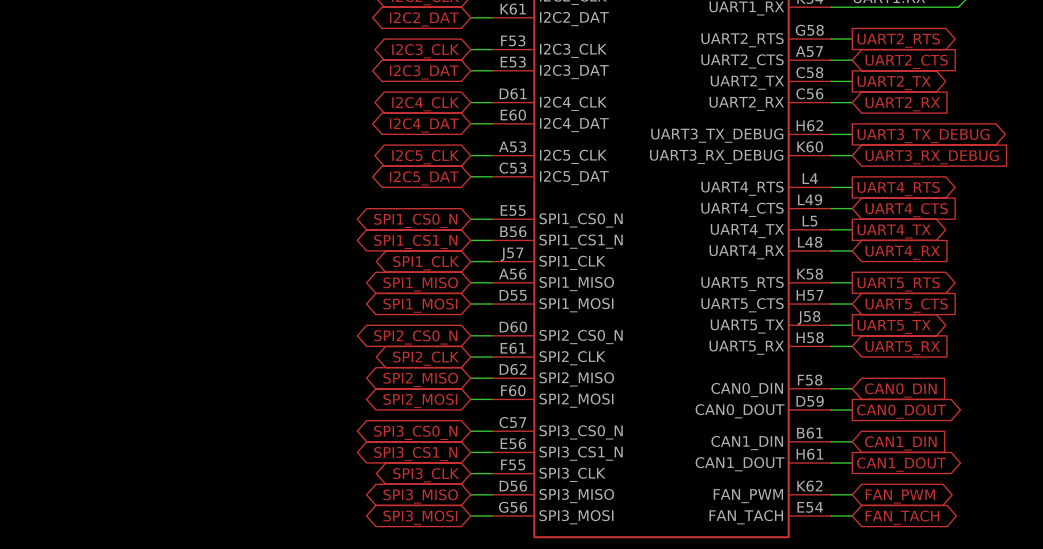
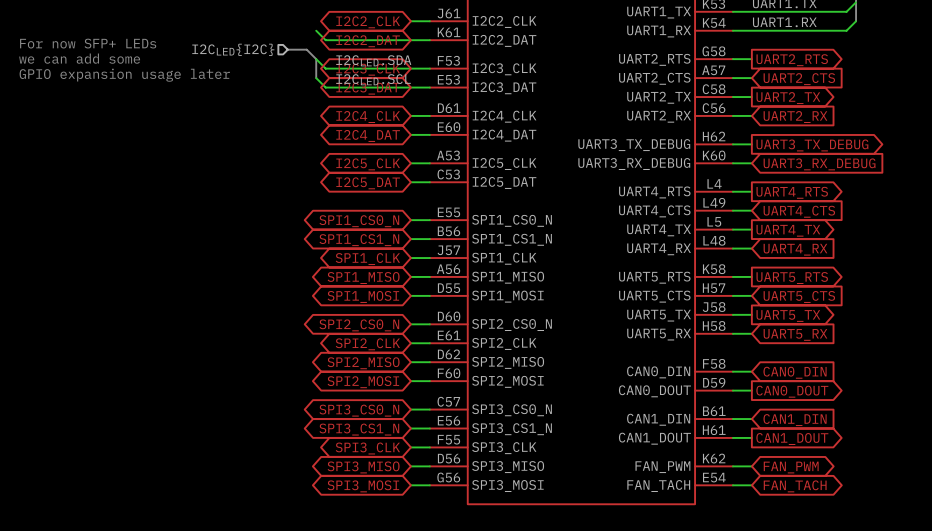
wire: none -> (316, 30) (325, 40) (410, 40)
text: none -> For now SFP+ LEDs (88, 43)
hierarchical label: none -> I2CLED{I2C} (233, 49)
bus: none -> (287, 49) (306, 49) (316, 59) (316, 78)
text: none -> we can add some (79, 58)
wire: none -> (316, 59) (325, 68) (410, 68)
label: none -> I2CLED.SDA (373, 60)
text: none -> GPIO expansion usage later (124, 75)
wire: none -> (316, 78) (325, 87) (410, 87)
label: none -> I2CLED.SCL (373, 79)

